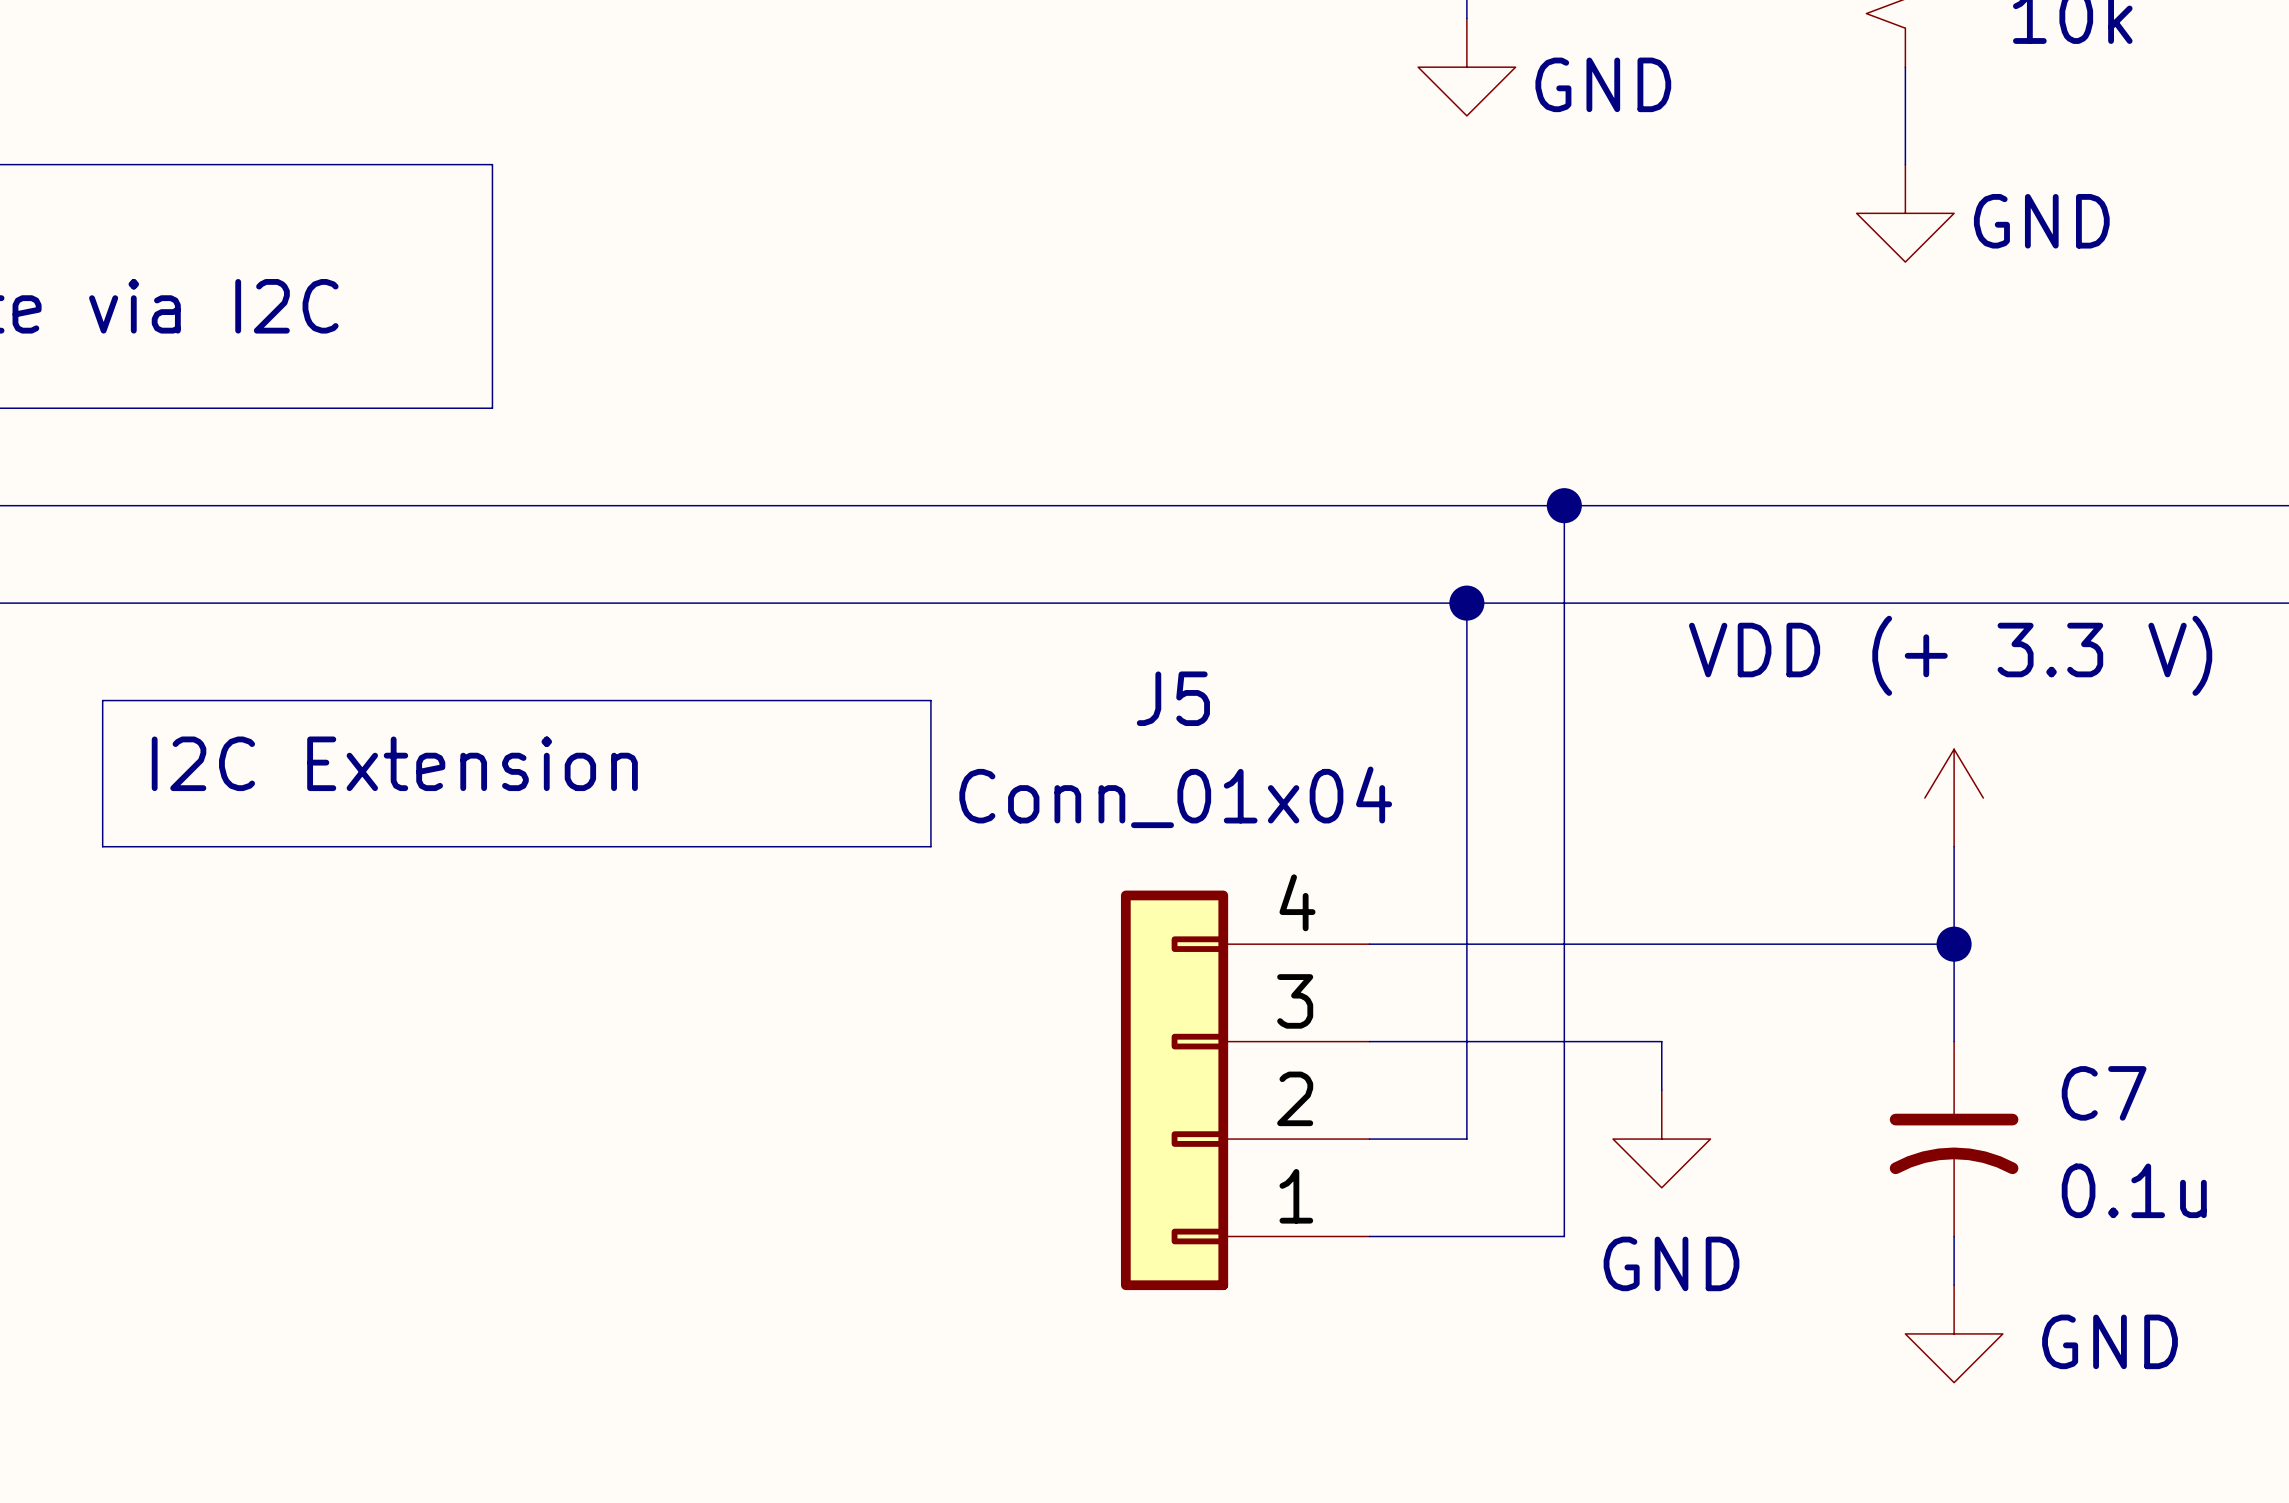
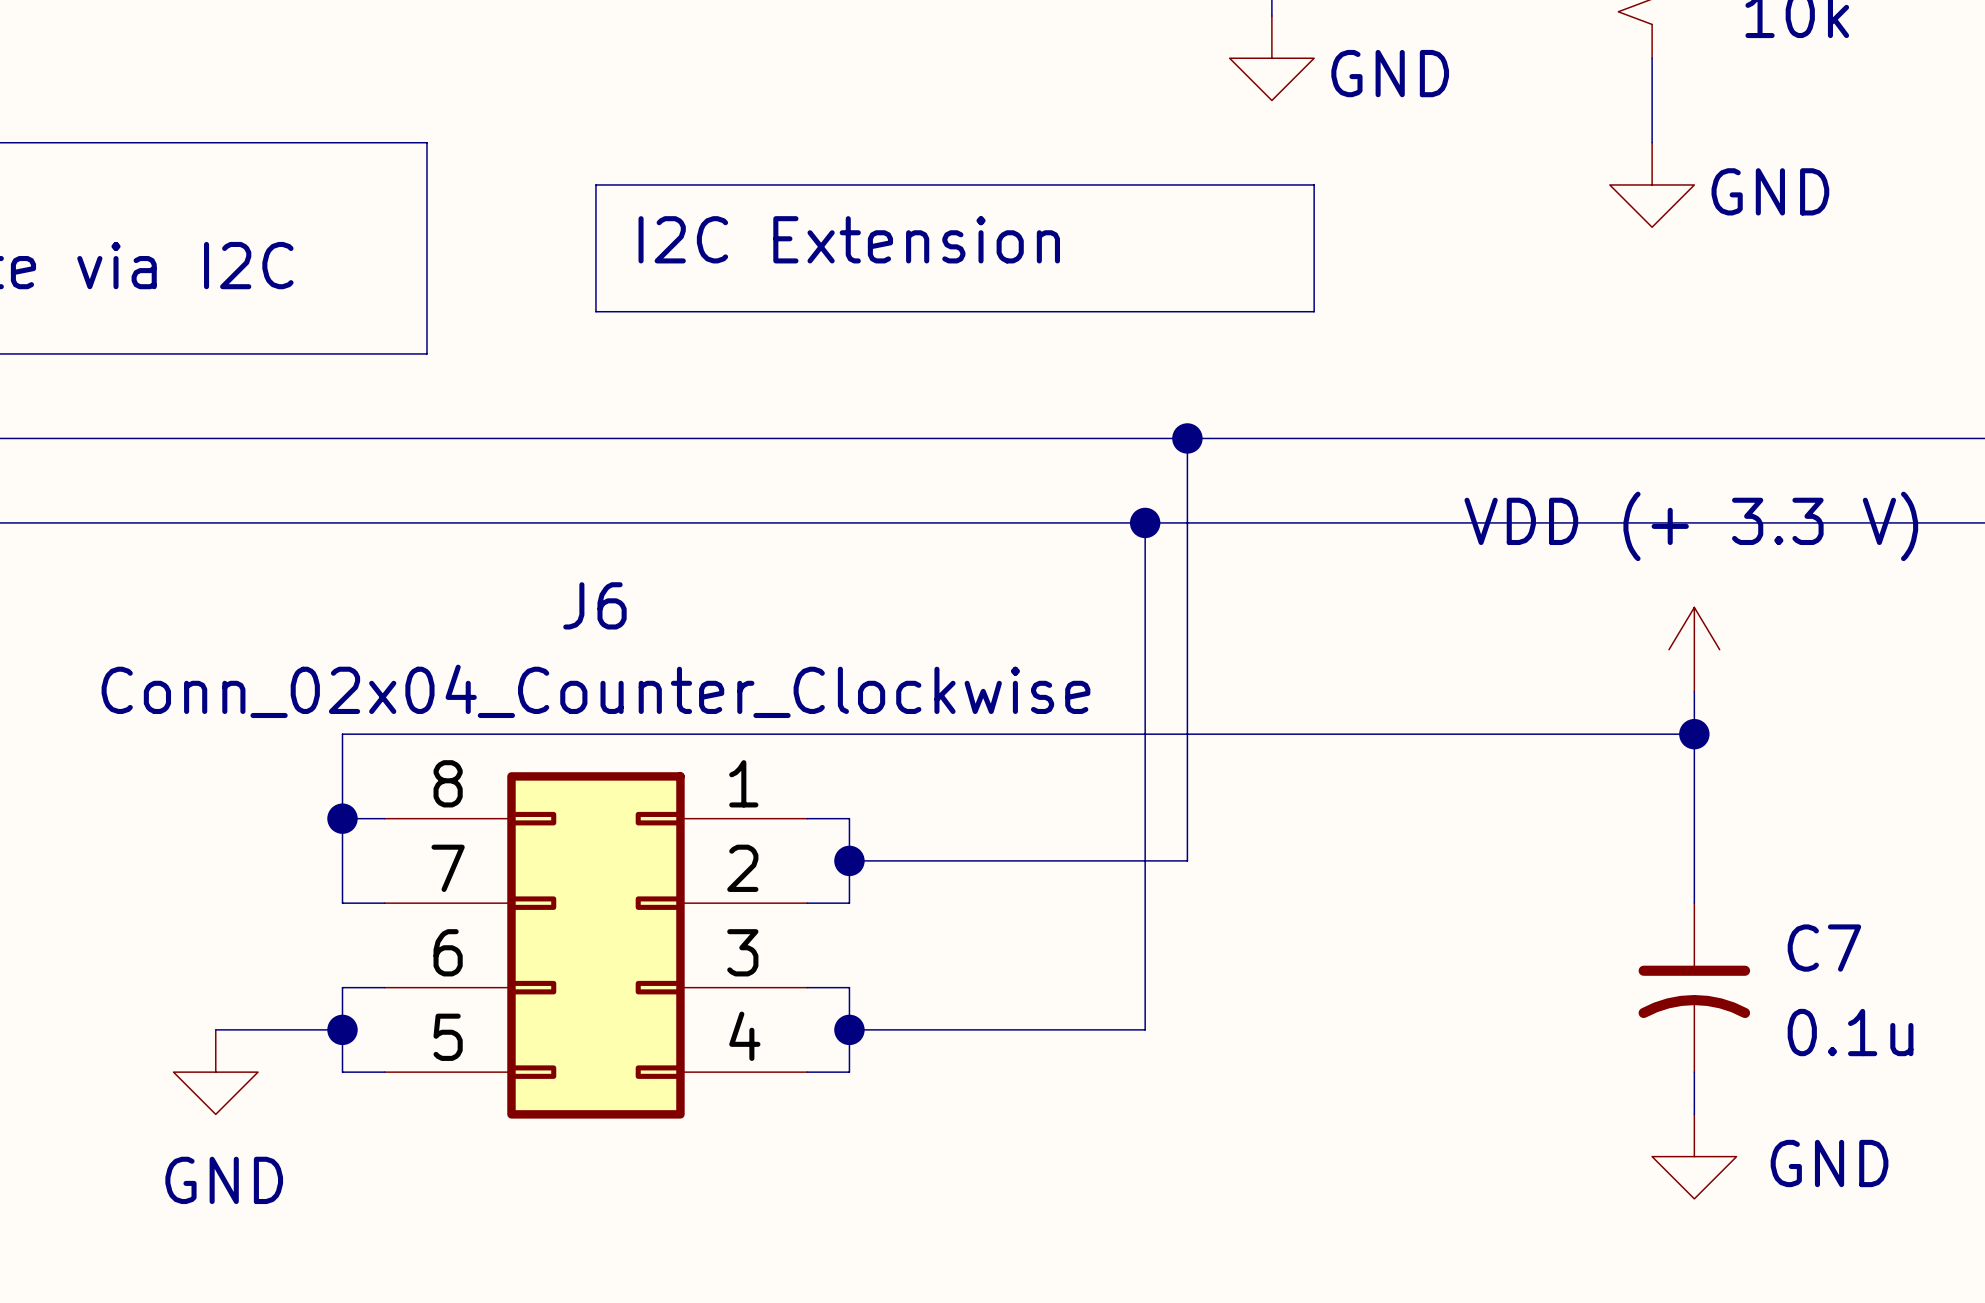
wire: none -> (1187, 438) (1187, 860) (849, 860)
junction: none -> (1187, 438)
wire: (1564, 505) (1564, 1236) (1369, 1236) -> none
junction: (1564, 505) -> none
wire: none -> (1145, 522) (1145, 1029) (849, 1029)
junction: none -> (1145, 522)
wire: (1466, 603) (1466, 1139) (1369, 1139) -> none
junction: (1466, 603) -> none
line: (102, 700) (930, 700) (930, 846) (102, 846) (102, 700) -> (595, 184) (1314, 184) (1314, 311) (595, 311) (595, 184)
text position: I2C Extension (394, 763) -> I2C Extension (849, 239)
wire: none -> (1694, 691) (1694, 734) (342, 734) (342, 903) (384, 903)
power symbol position: VDD (+ 3.3 V) (1954, 798) -> VDD (+ 3.3 V) (1694, 649)
wire: none -> (342, 818) (384, 818)
junction: none -> (342, 818)
wire: none -> (807, 818) (849, 818) (849, 903) (807, 903)
wire: (1369, 944) (1954, 944) -> none
junction position: (1954, 944) -> (1694, 734)
junction: none -> (849, 860)
wire: (1369, 1041) (1661, 1041) (1661, 1090) -> none
J6: none -> Conn_02x04_Counter_Clockwise (595, 945)
J5: Conn_01x04 (1245, 1090) -> none
wire: none -> (384, 987) (342, 987) (342, 1072) (384, 1072)
wire: none -> (807, 987) (849, 987) (849, 1072) (807, 1072)
power symbol: GND (1661, 1139) -> none
wire: none -> (215, 1029) (342, 1029)
junction: none -> (342, 1029)
junction: none -> (849, 1029)
power symbol: none -> GND (215, 1072)

